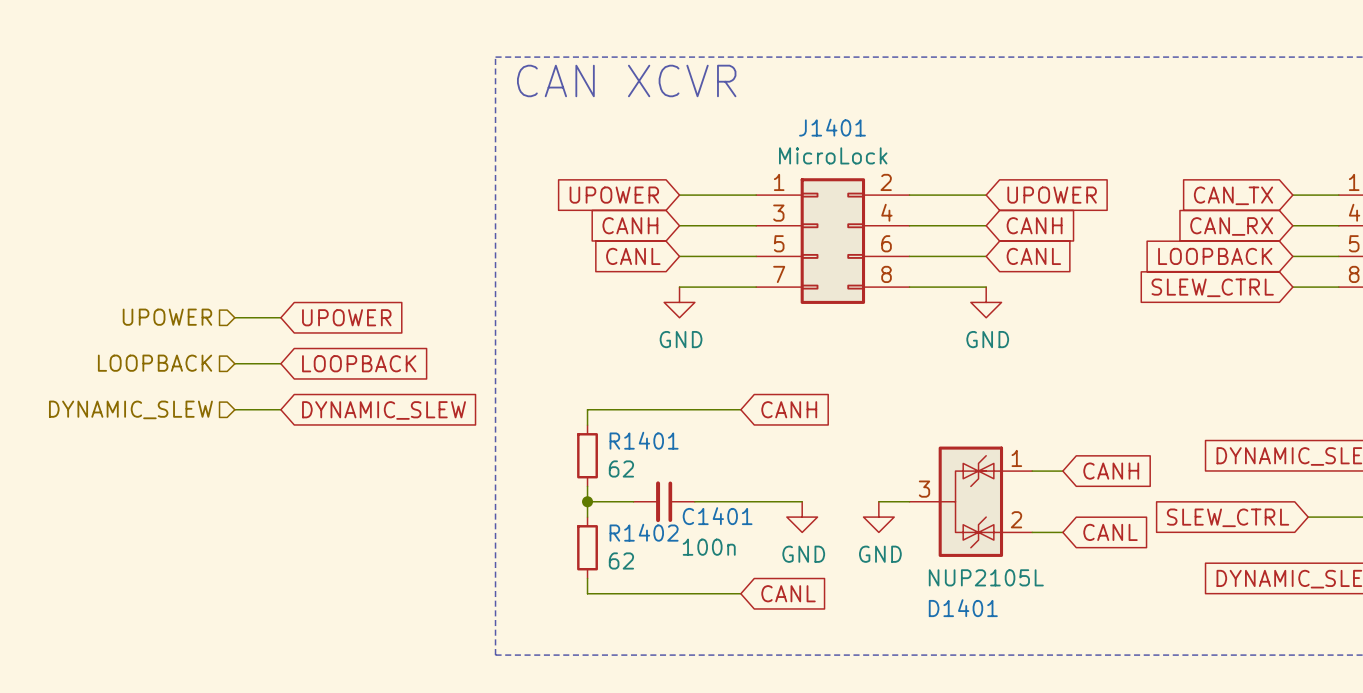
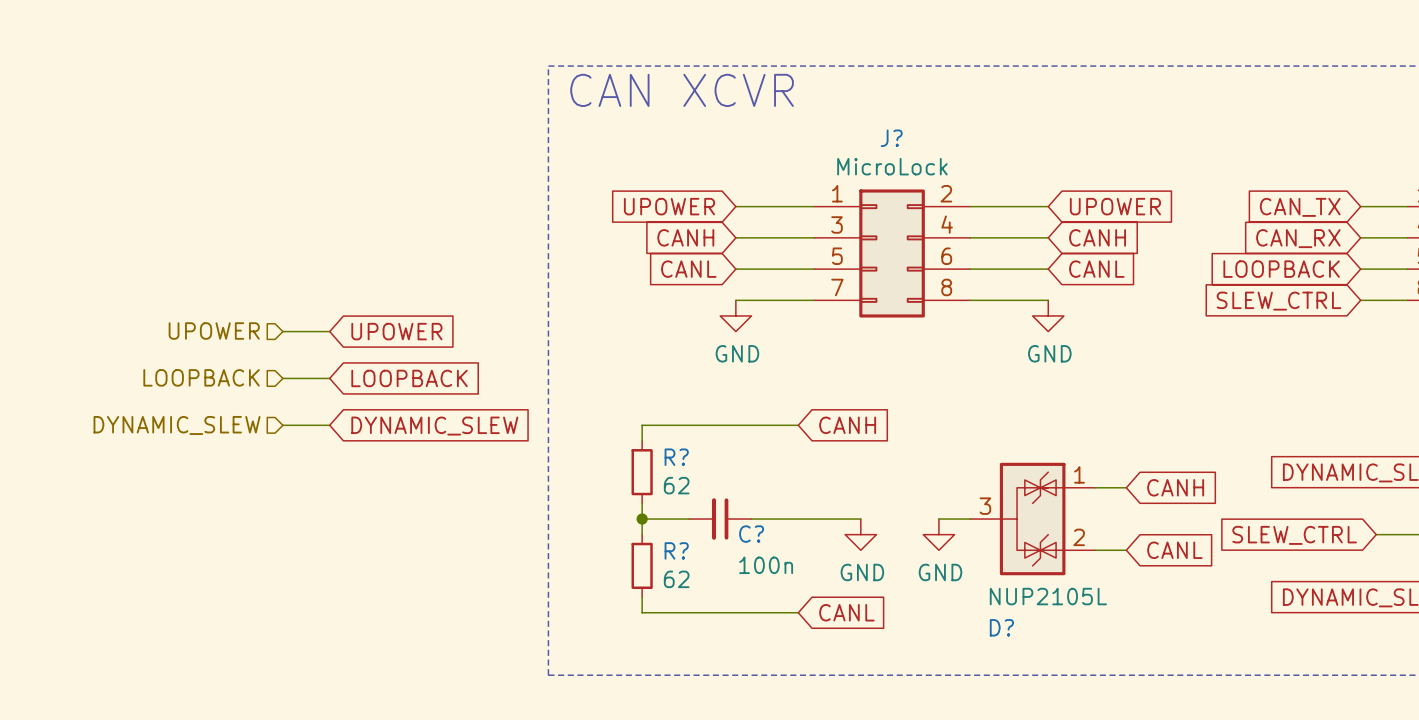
J1401 name: J1401 (832, 127) -> J? (891, 138)
R1401 name: R1401 (644, 440) -> R? (676, 457)
C1401 name: C1401 (717, 516) -> C? (751, 534)
R1402 name: R1402 (644, 532) -> R? (676, 550)
D1401 name: D1401 (963, 608) -> D? (1001, 627)

